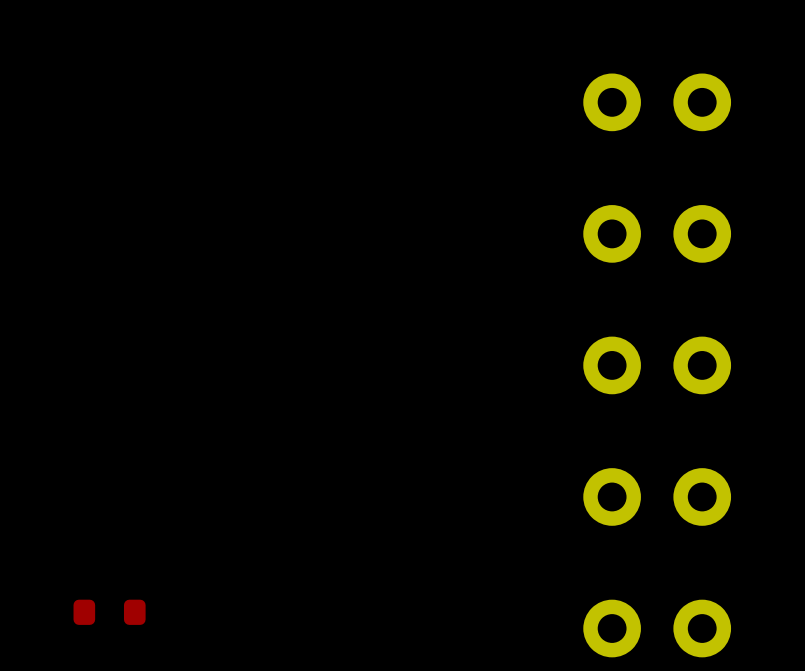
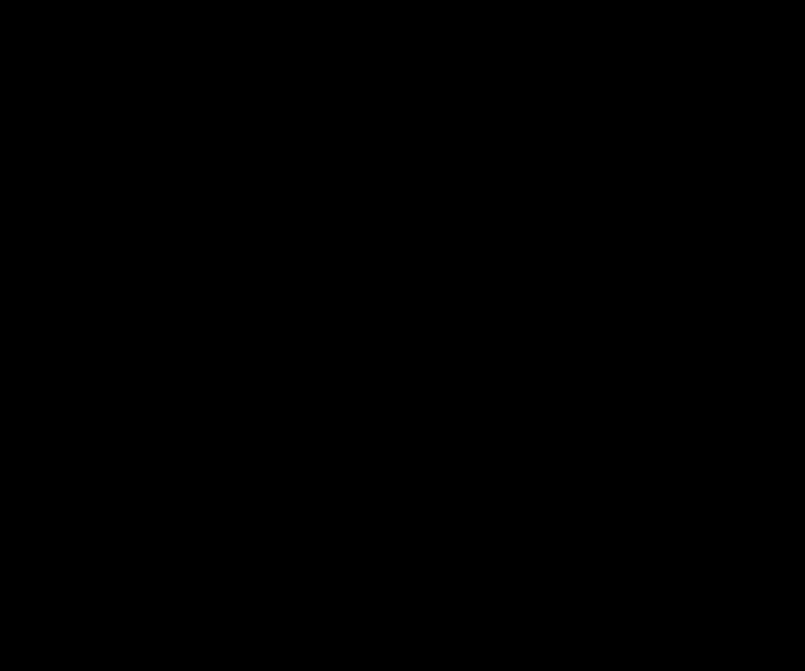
part: (657, 102) -> none
part: (657, 233) -> none
part: (657, 365) -> none
part: (657, 496) -> none
part: (109, 612) -> none
part: (657, 628) -> none

